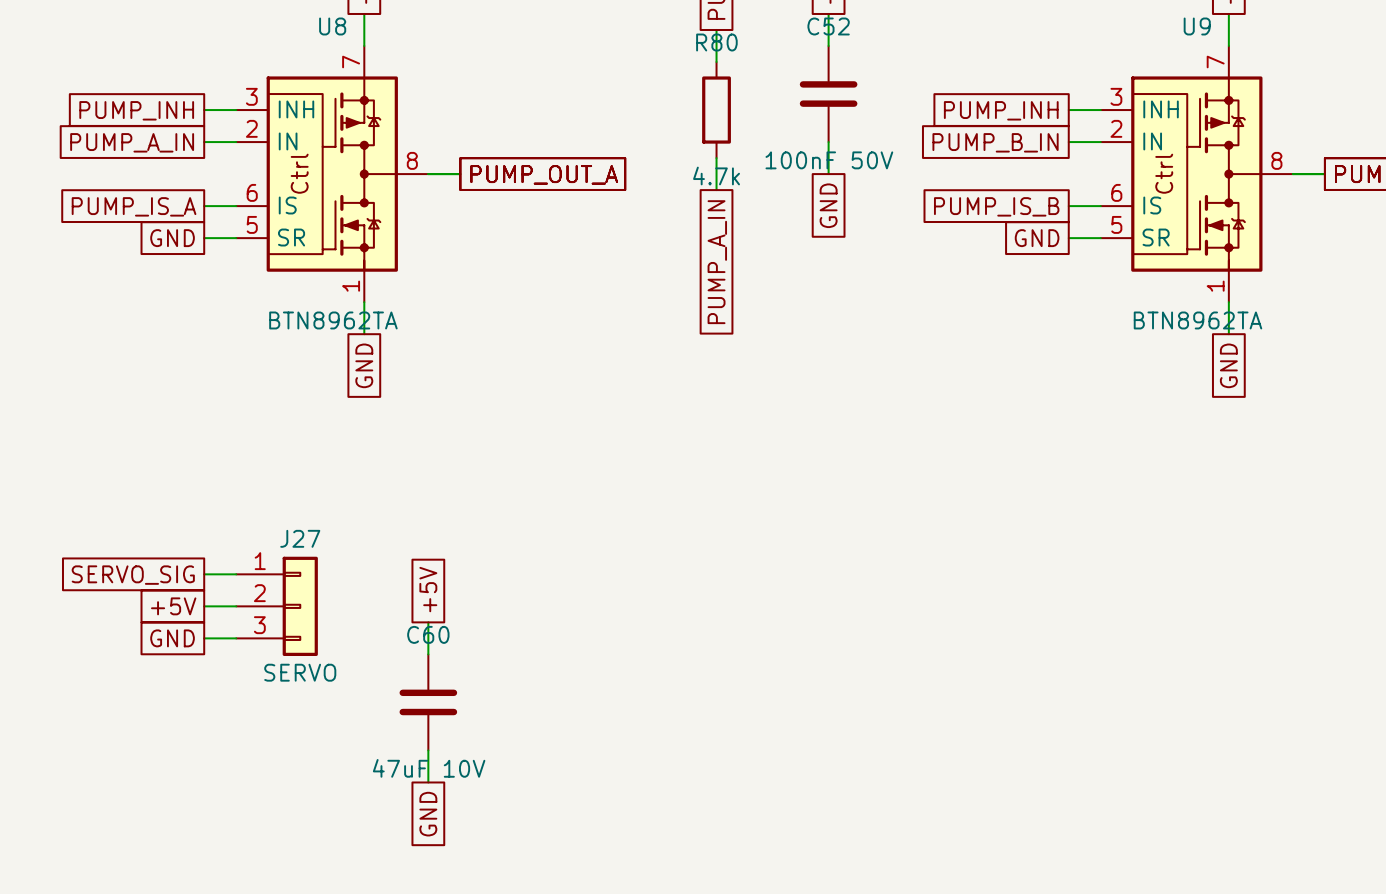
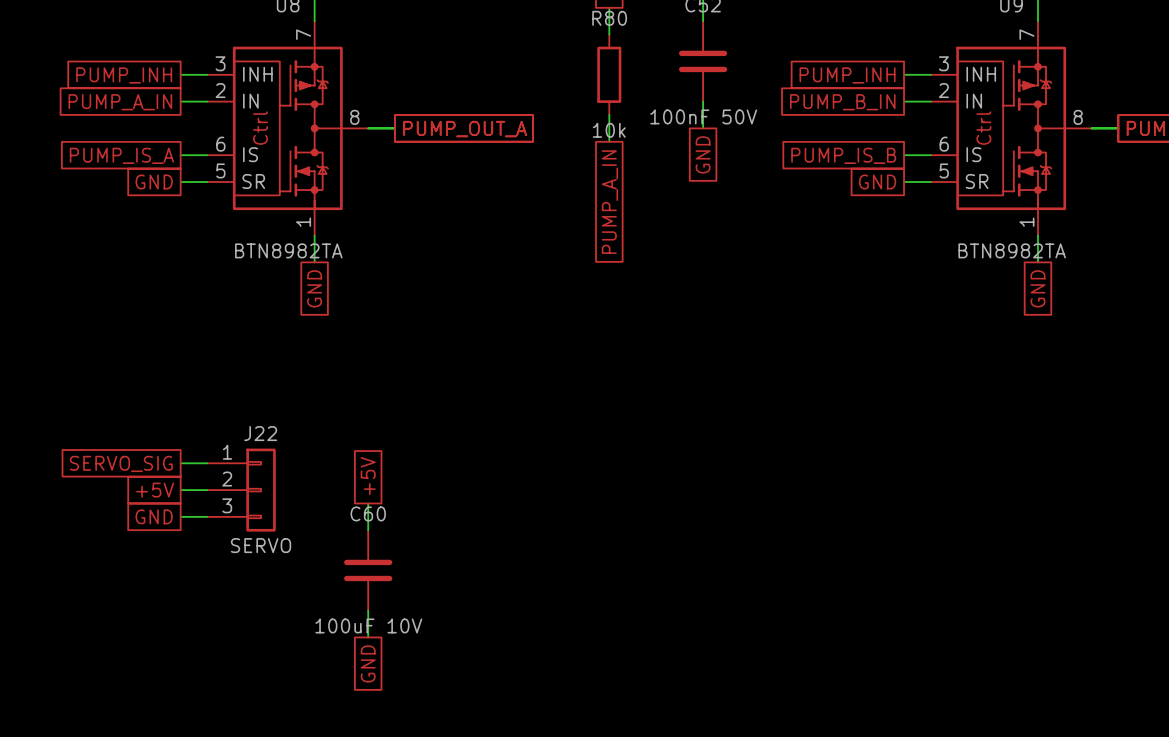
R80 value: 4.7k (716, 176) -> 10k (609, 130)
U8 value: BTN8962TA (333, 320) -> BTN8982TA (288, 250)
U9 value: BTN8962TA (1197, 320) -> BTN8982TA (1012, 250)
J27 name: J27 (300, 538) -> J22 (260, 433)
C60 value: 47uF 10V (429, 768) -> 100uF 10V (368, 625)

